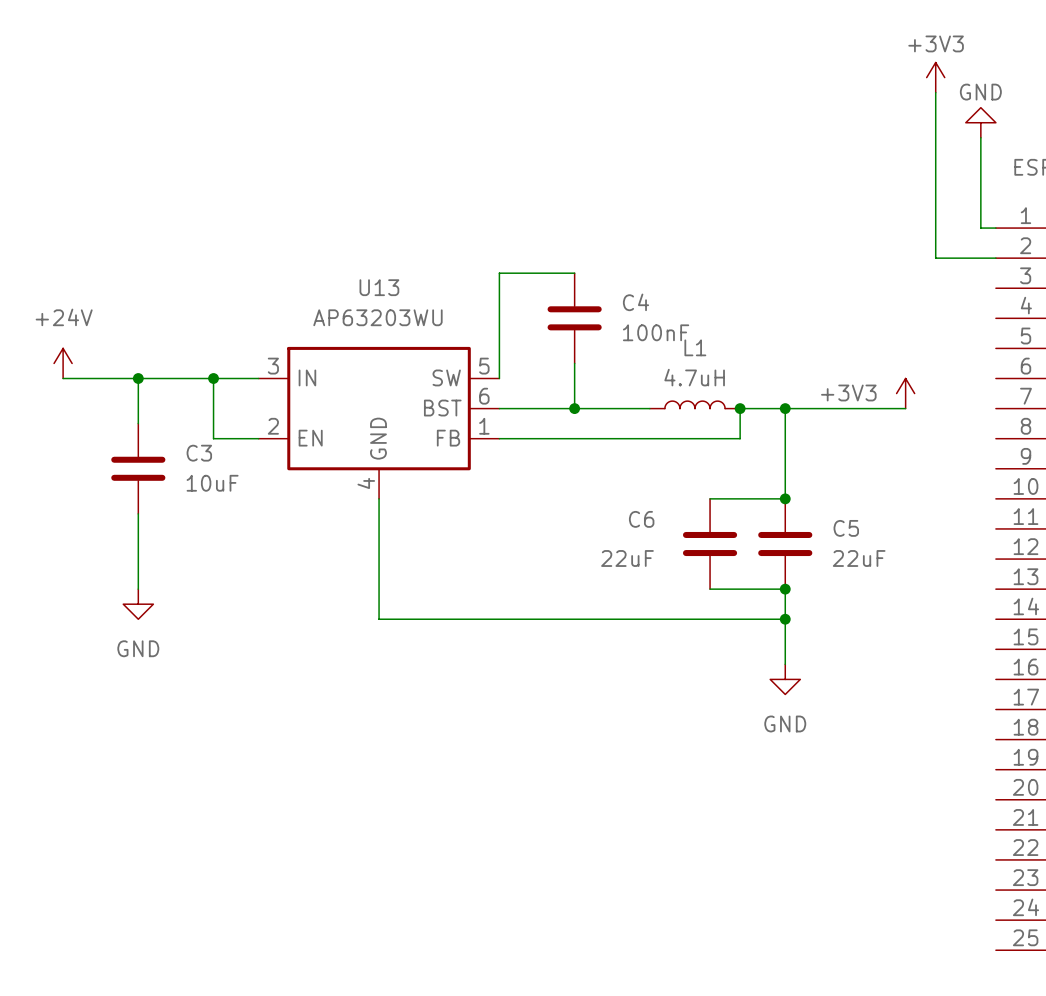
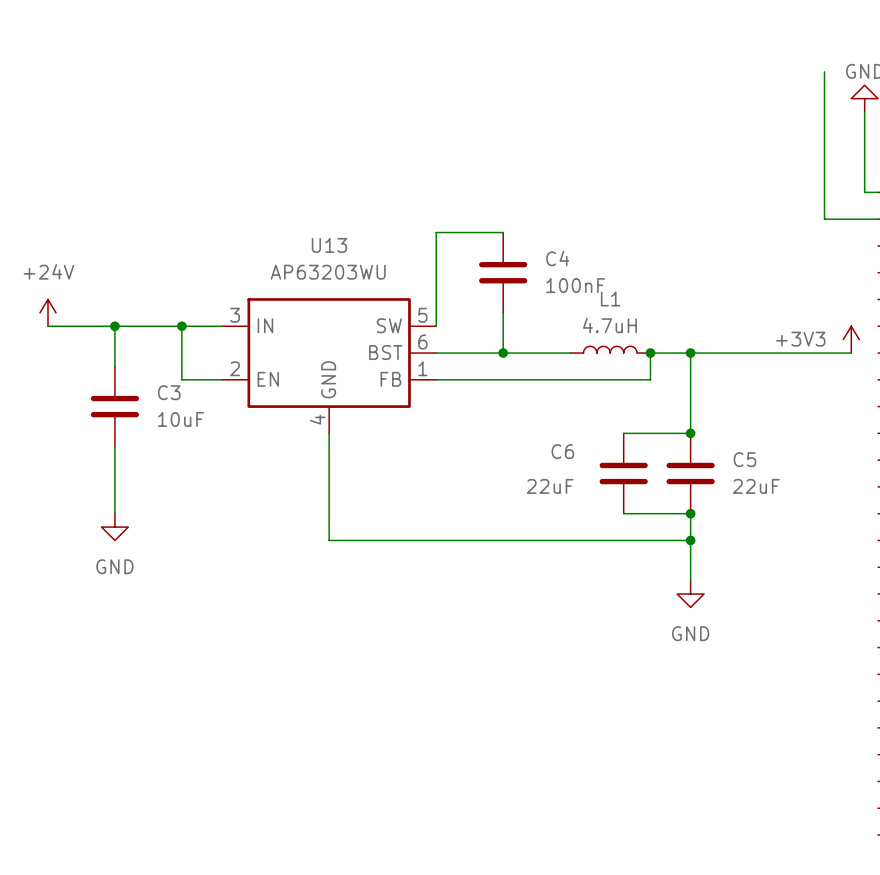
power symbol: +3V3 (935, 77) -> none
power symbol position: +3V3 (905, 393) -> +3V3 (851, 339)
wire: none -> (797, 353) (851, 353)

